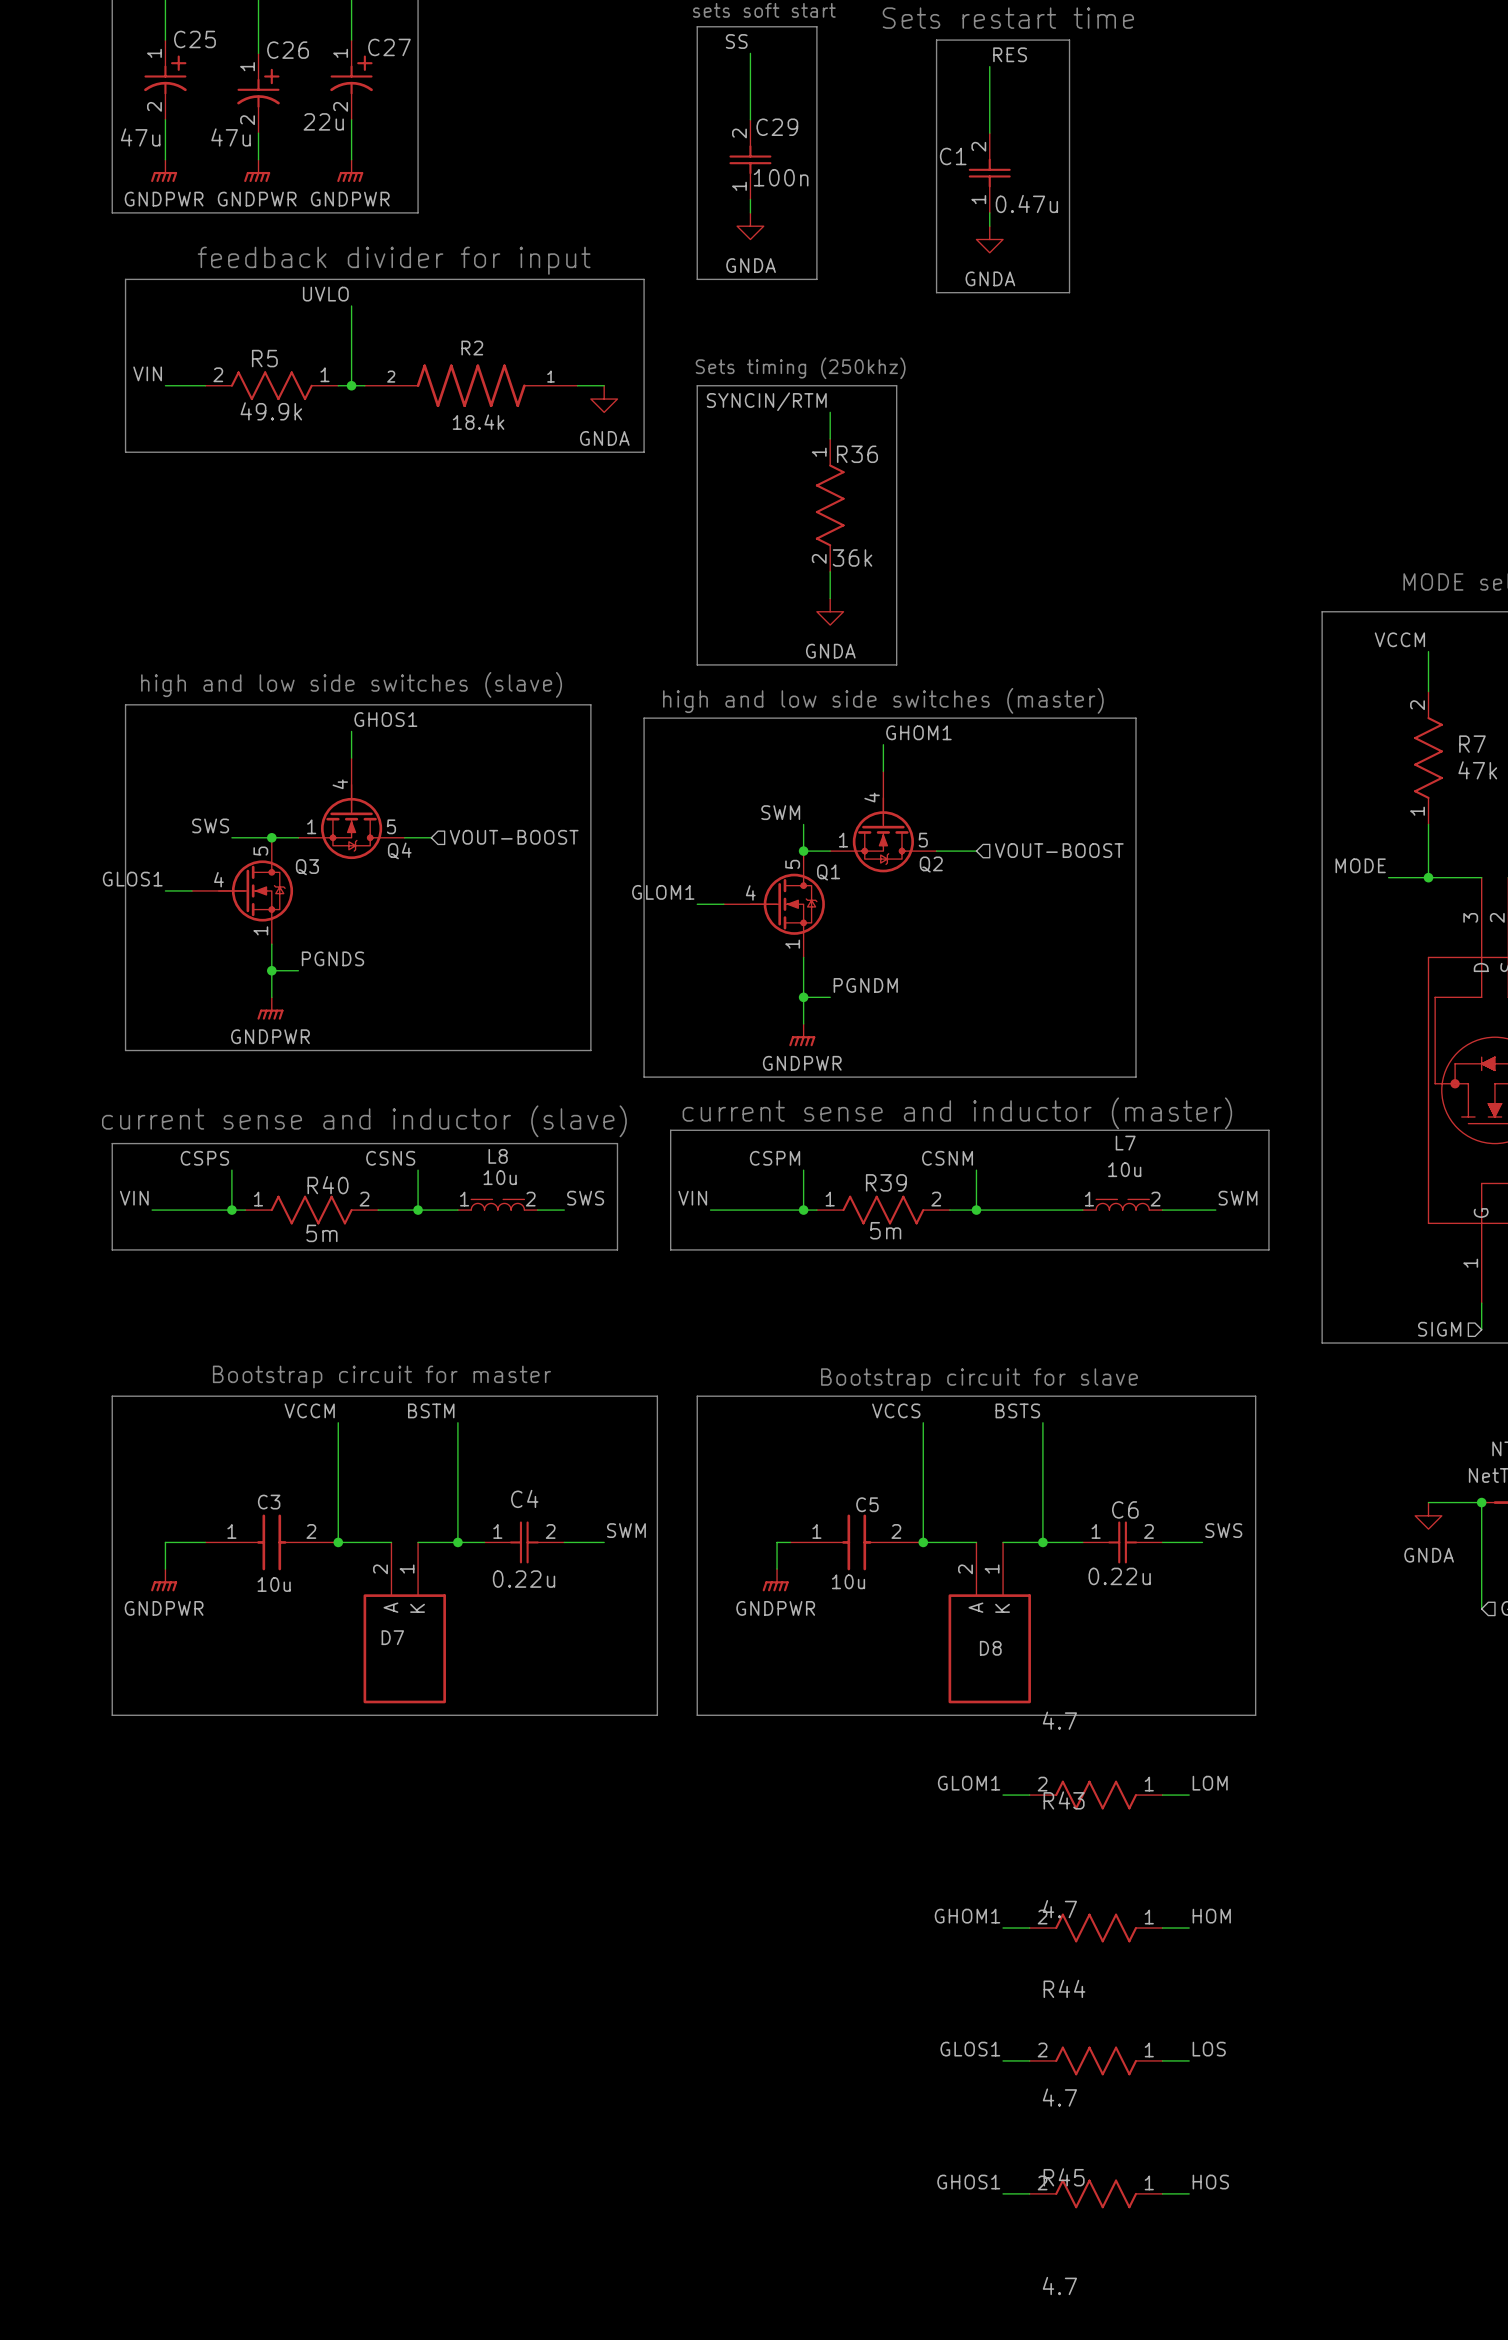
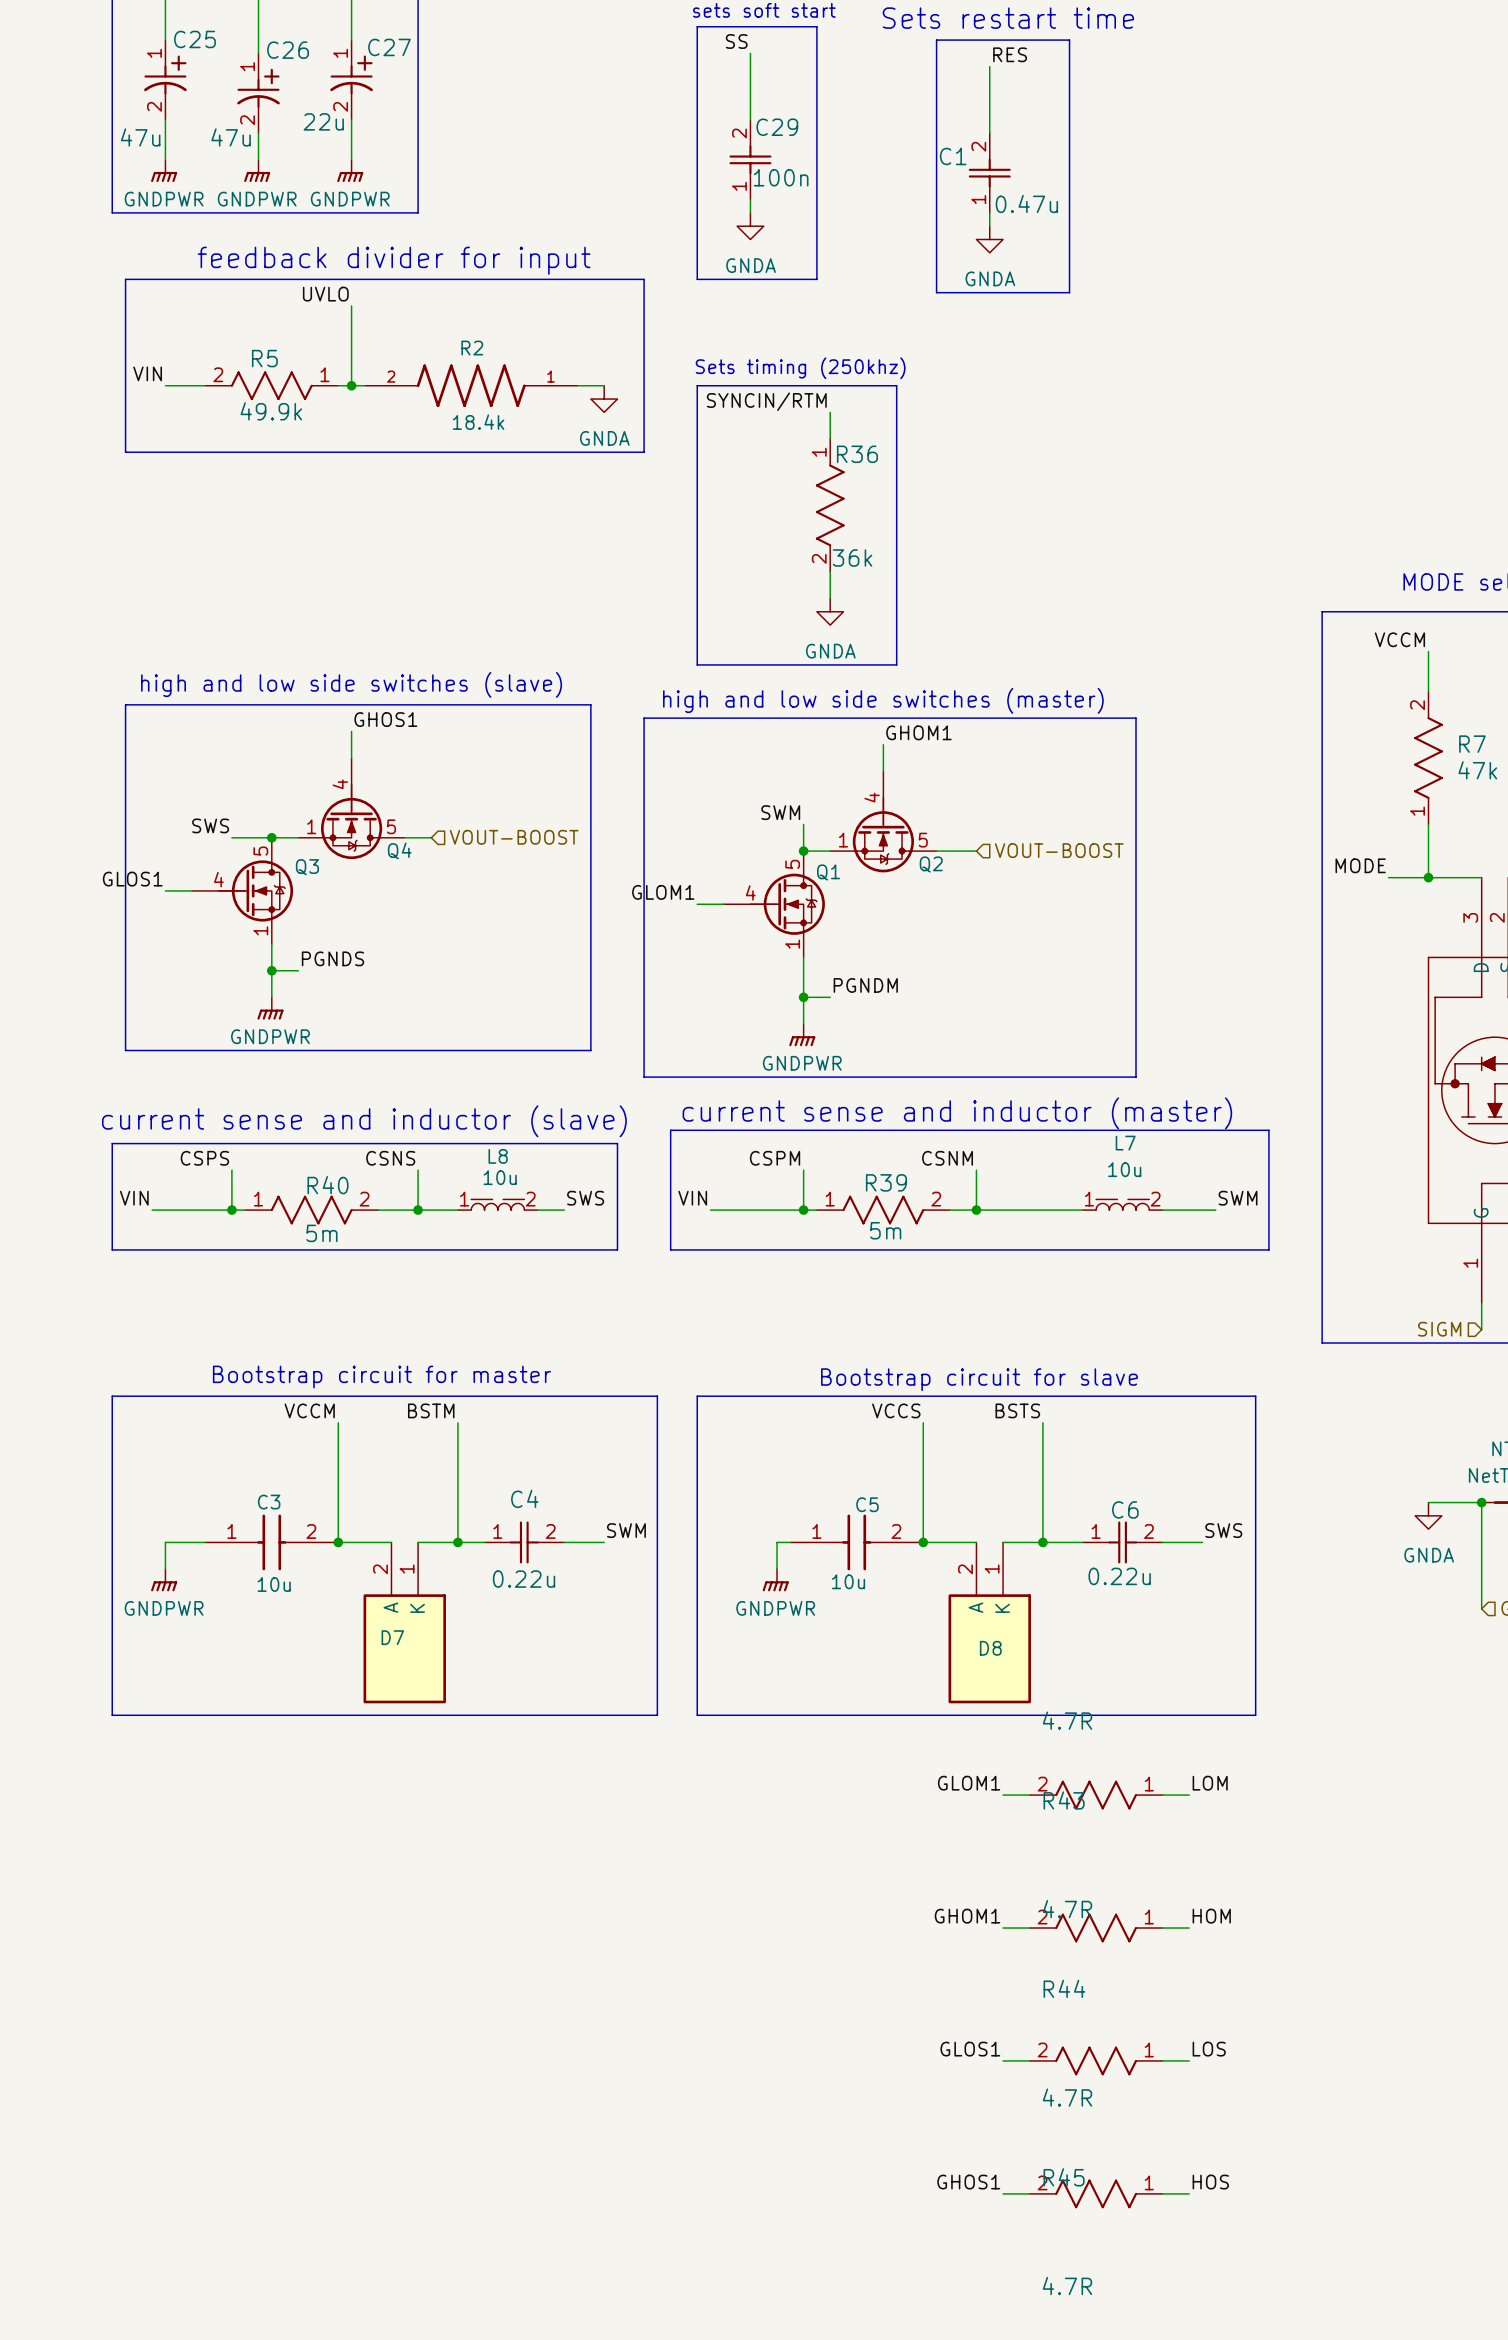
R43 value: 4.7 (1059, 1720) -> 4.7R (1067, 1720)
R44 value: 4.7 (1059, 1909) -> 4.7R (1067, 1909)
R45 value: 4.7 (1059, 2097) -> 4.7R (1067, 2097)
part value: 4.7 (1059, 2286) -> 4.7R (1067, 2286)

